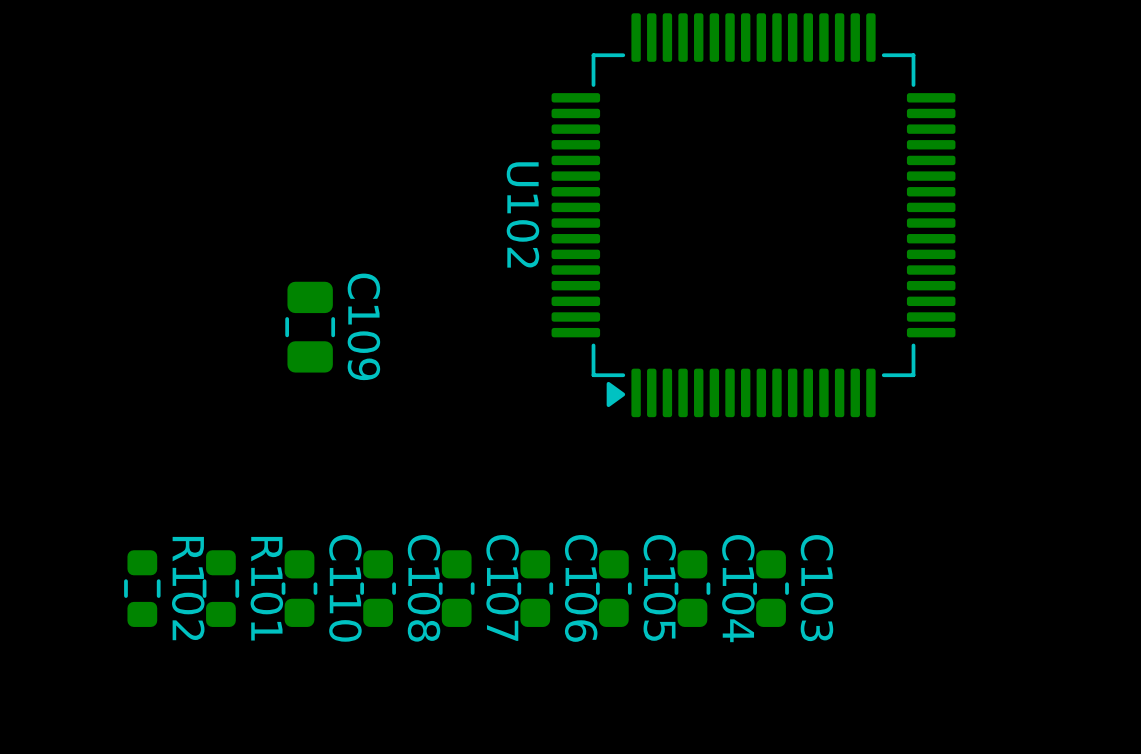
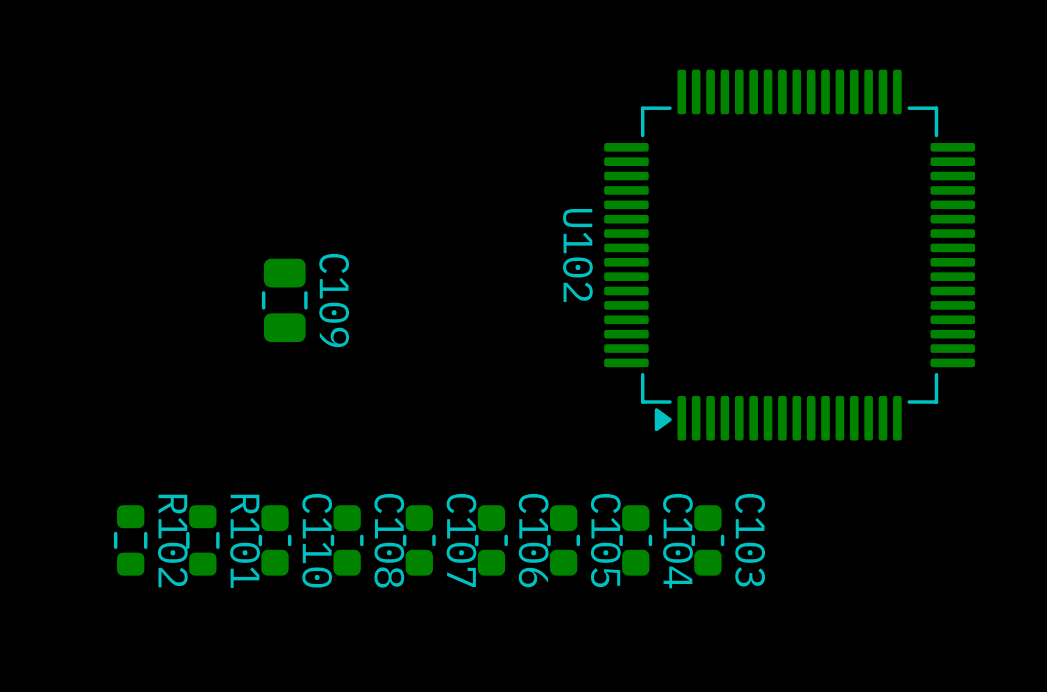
U102 position: (753, 215) -> (789, 255)

